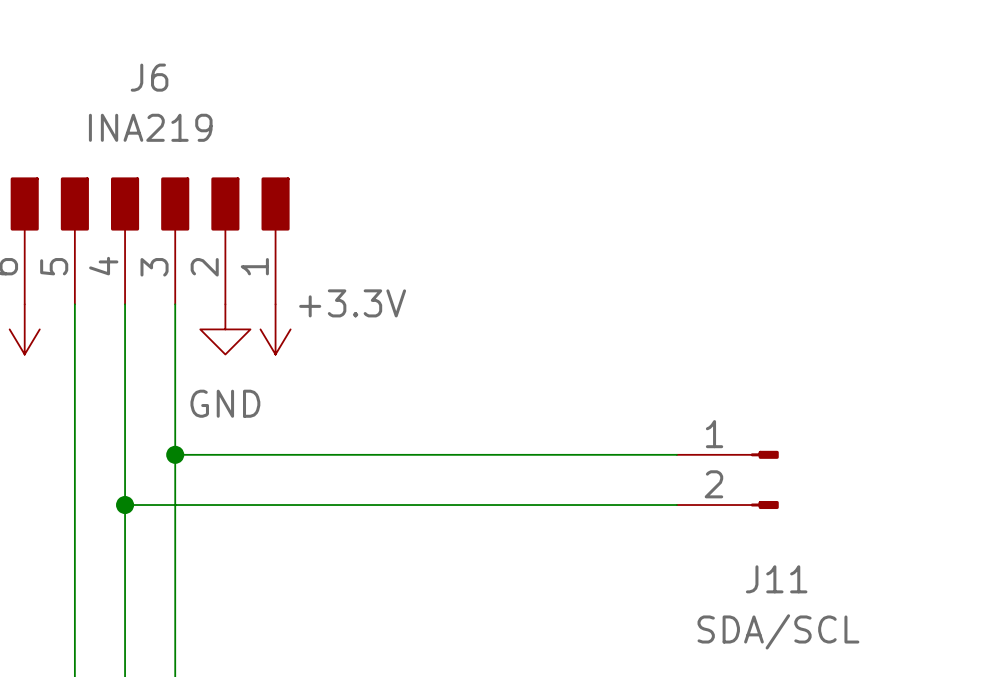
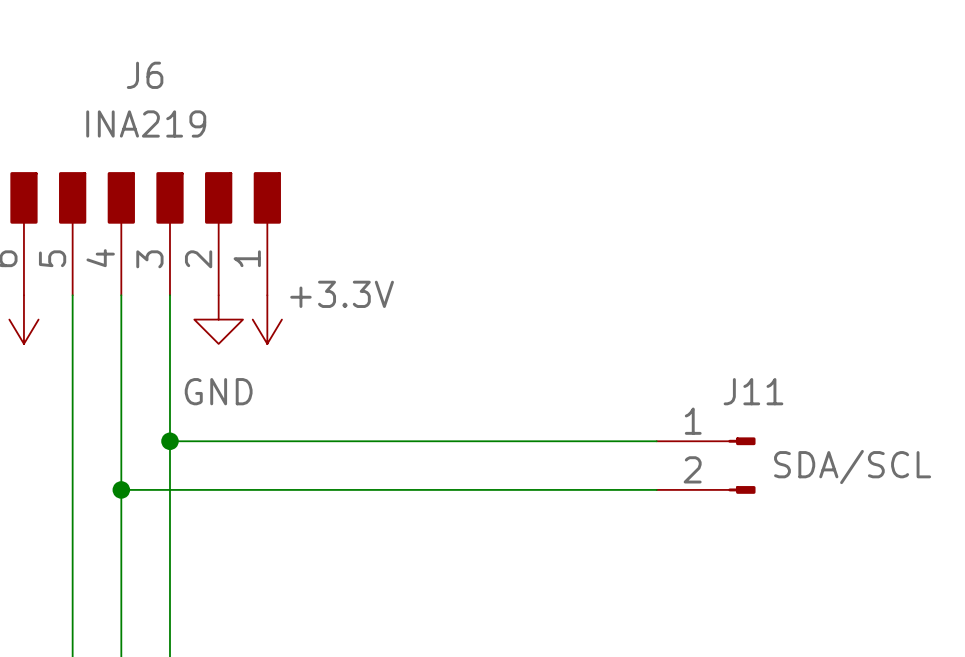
J11 name position: J11 (776, 579) -> J11 (753, 391)
J11 value position: SDA/SCL (778, 631) -> SDA/SCL (852, 467)

